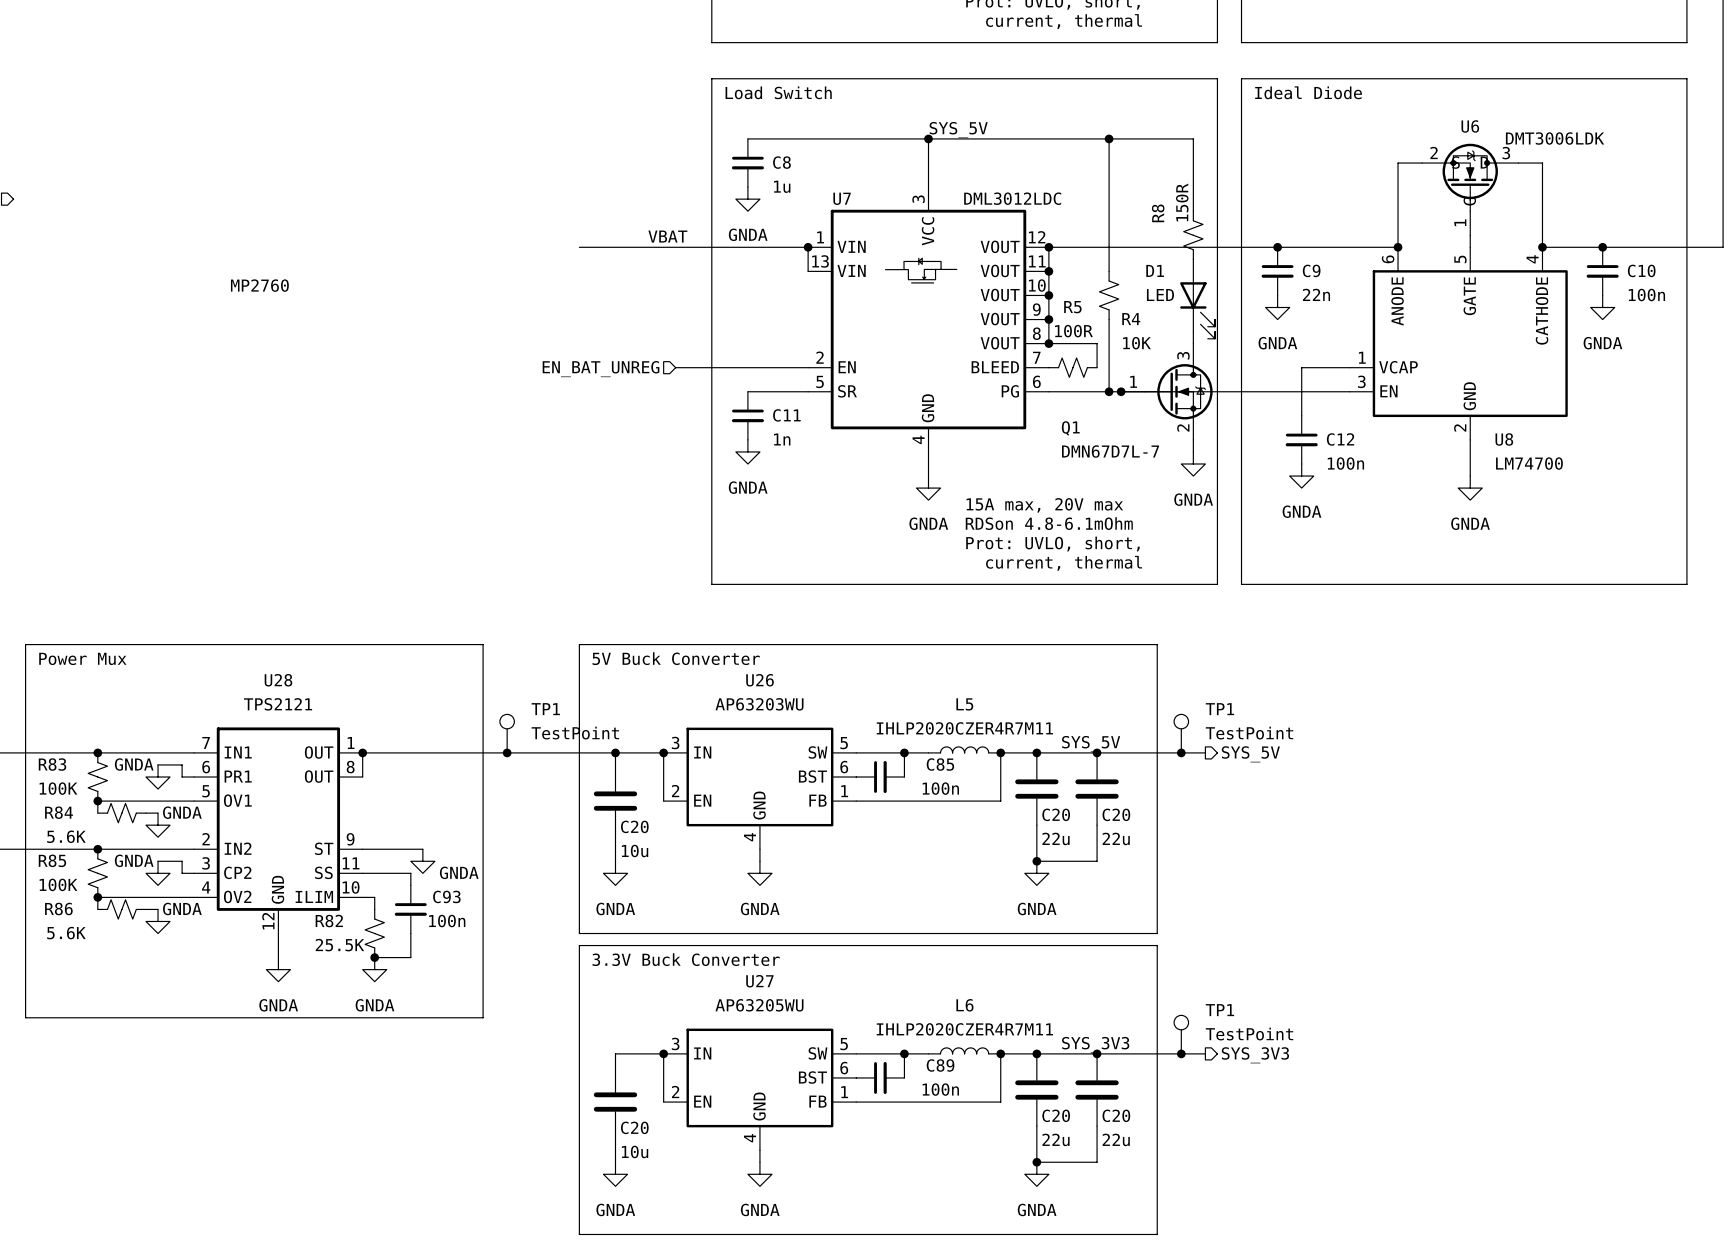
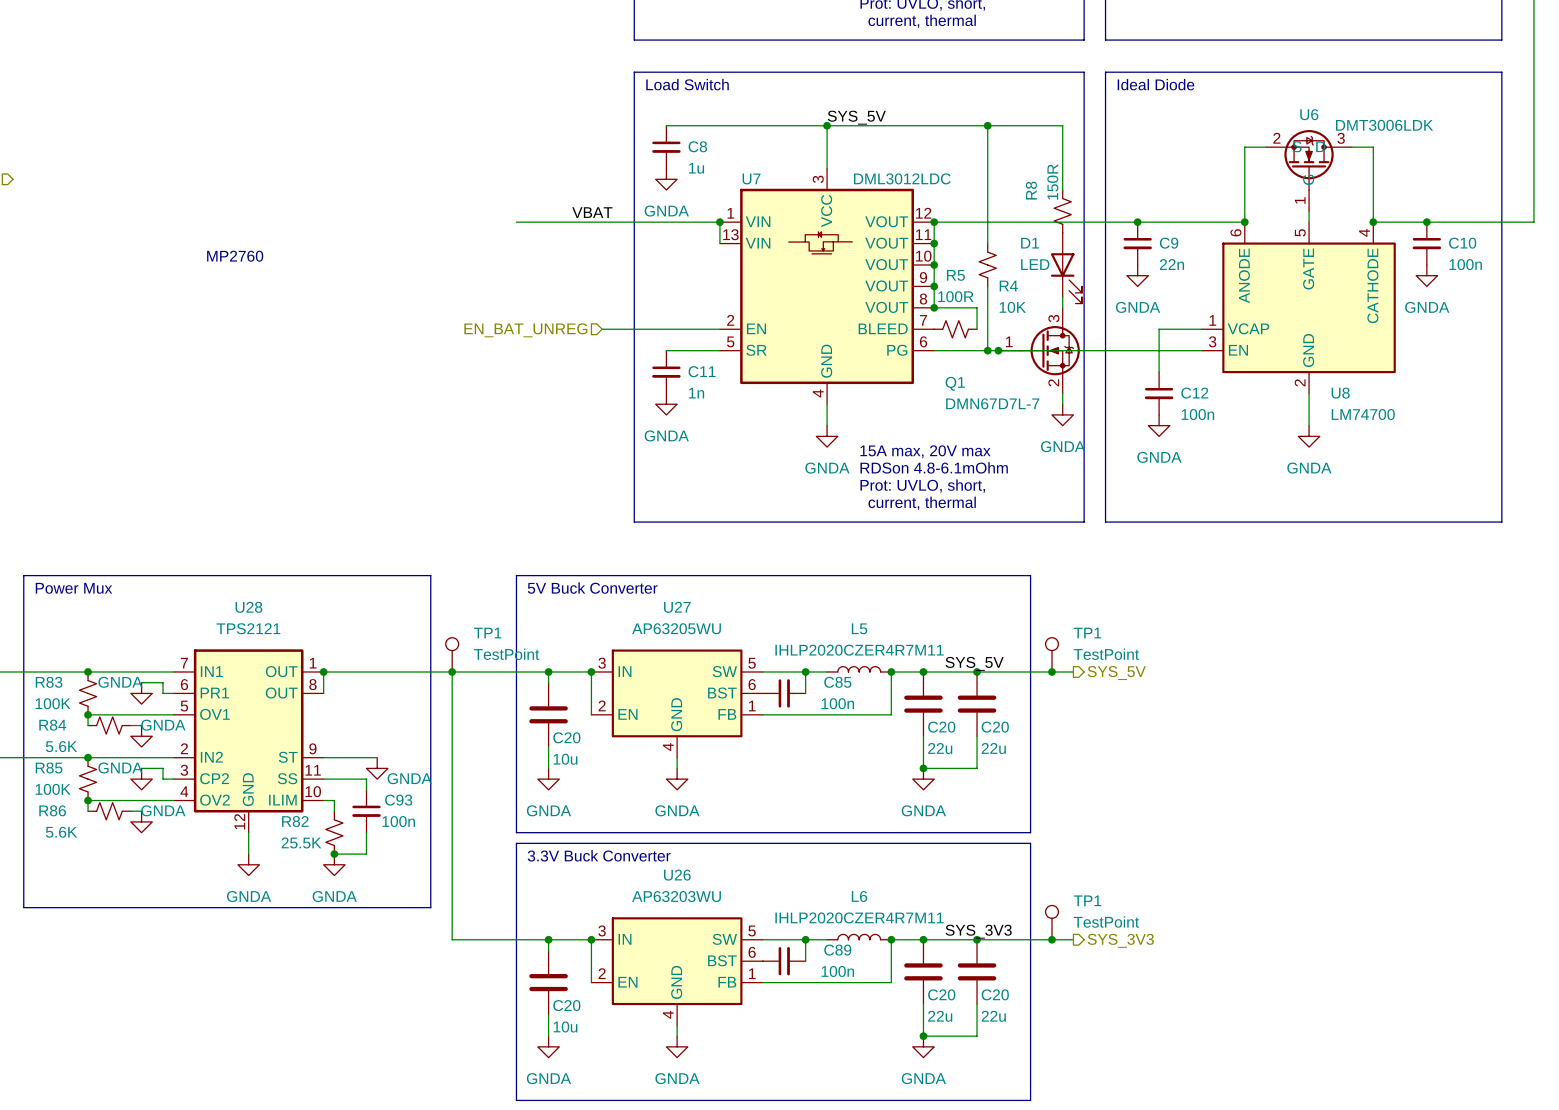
U26 name: U26 (760, 680) -> U27 (677, 607)
U26 value: AP63203WU (759, 704) -> AP63205WU (676, 628)
wire: none -> (452, 671) (452, 939) (548, 939)
U27 name: U27 (759, 981) -> U26 (677, 875)
U27 value: AP63205WU (759, 1005) -> AP63203WU (676, 896)
junction: none -> (548, 939)

